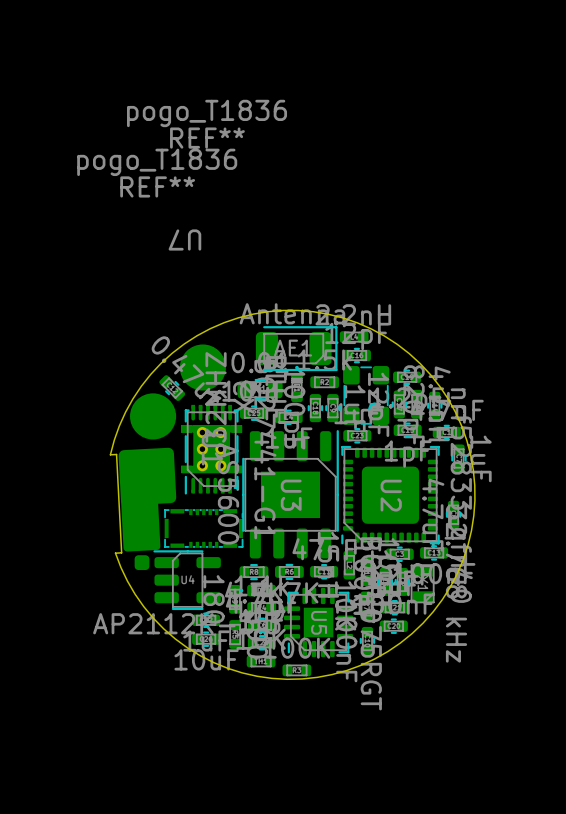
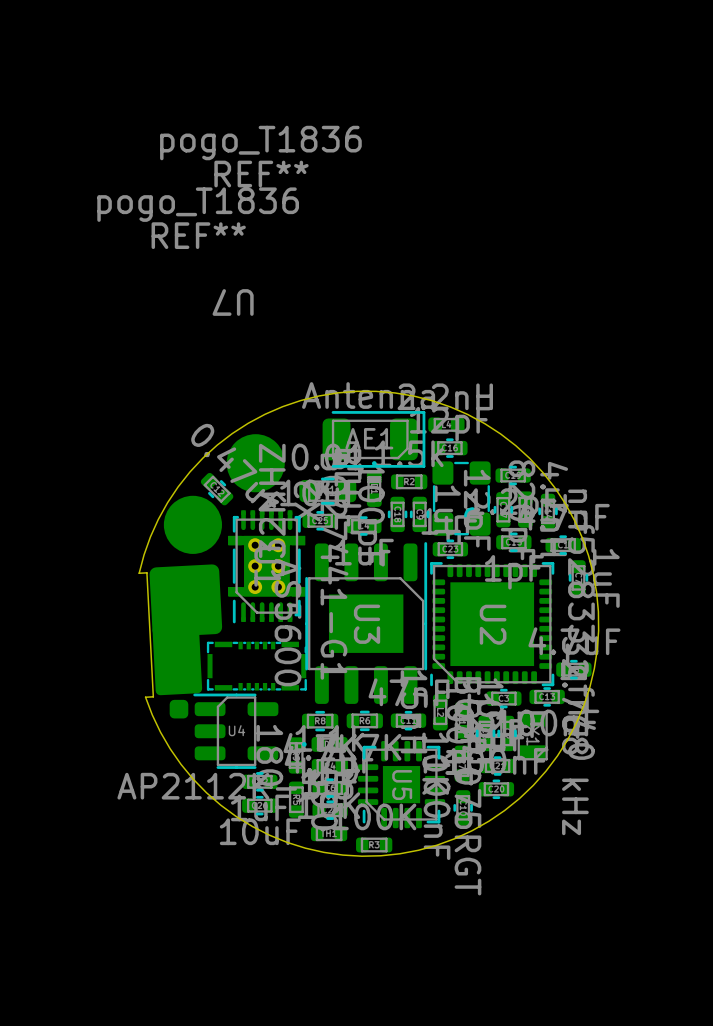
U2 footprint: [341, 445, 440, 545] -> [430, 562, 555, 687]
part rotation: 0° (453, 514) -> 90° clockwise (573, 669)

